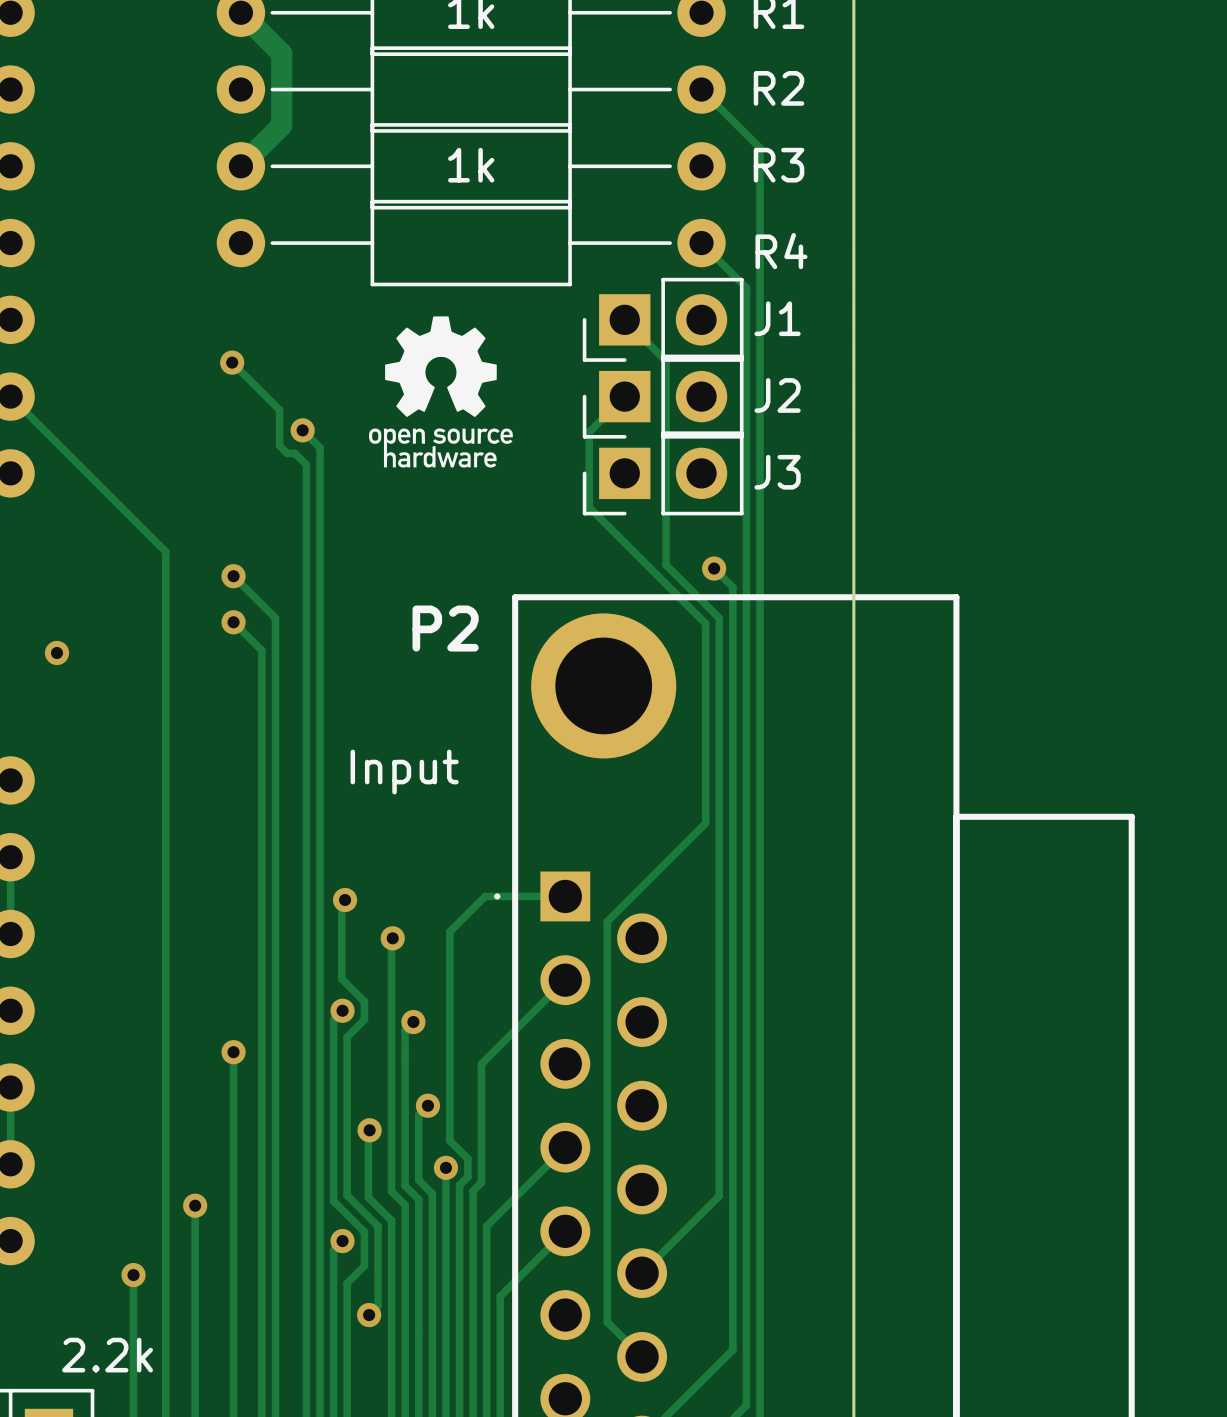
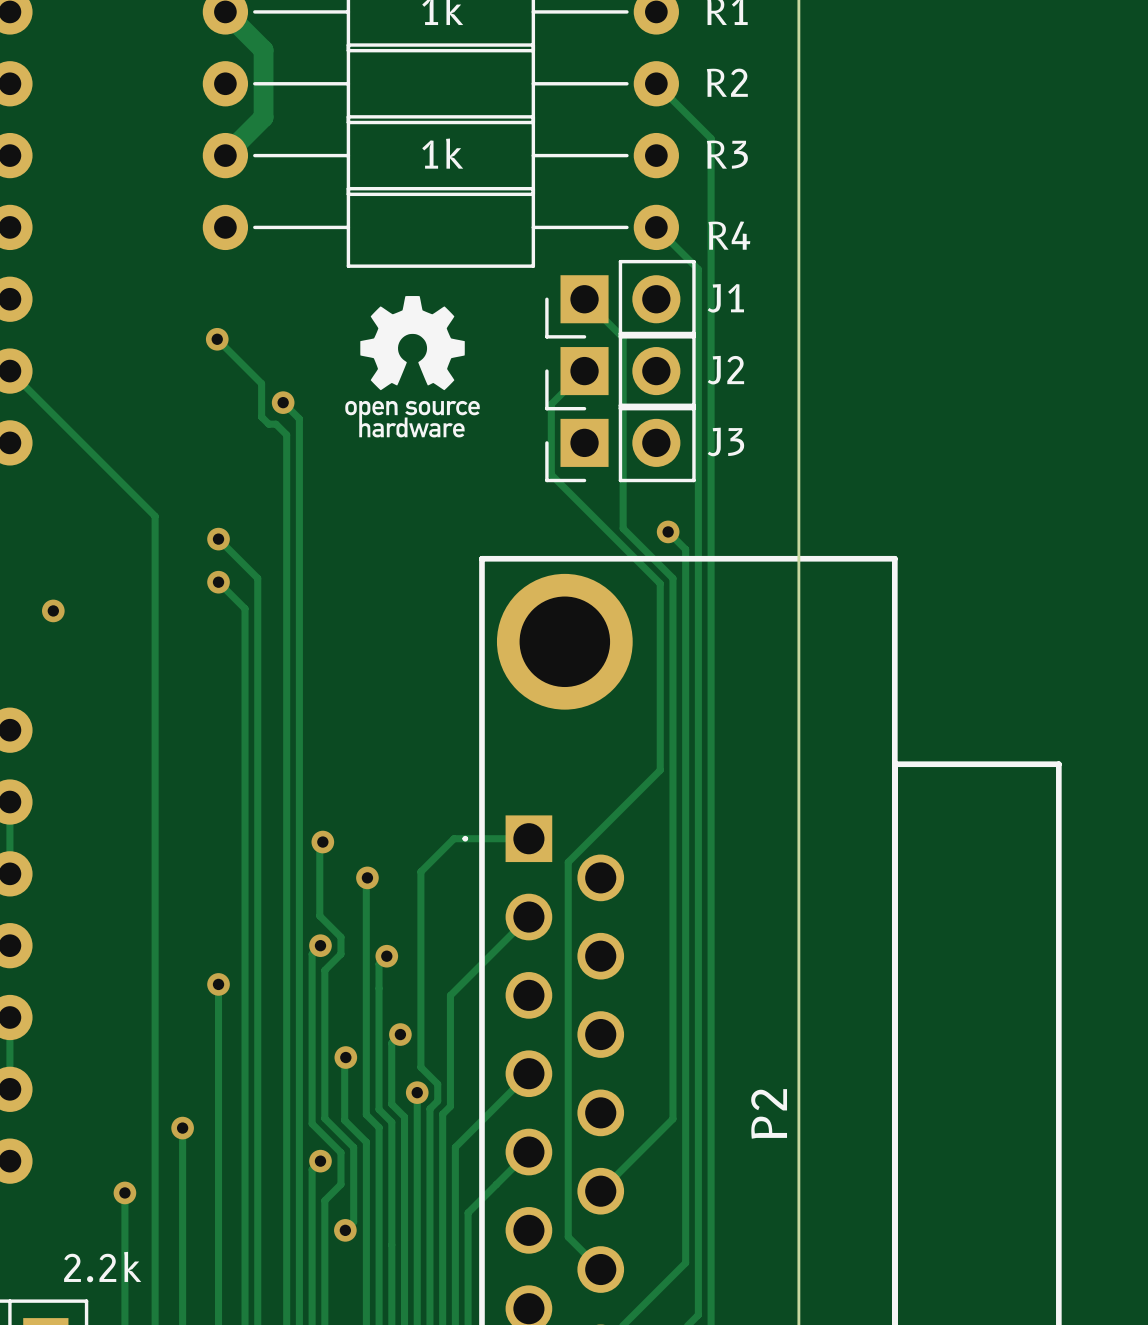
P2 name rotation: 0° (445, 628) -> 90° counterclockwise (769, 1113)
P2 name position: P2 (445, 628) -> P2 (769, 1113)
text: Input (404, 772) -> none

